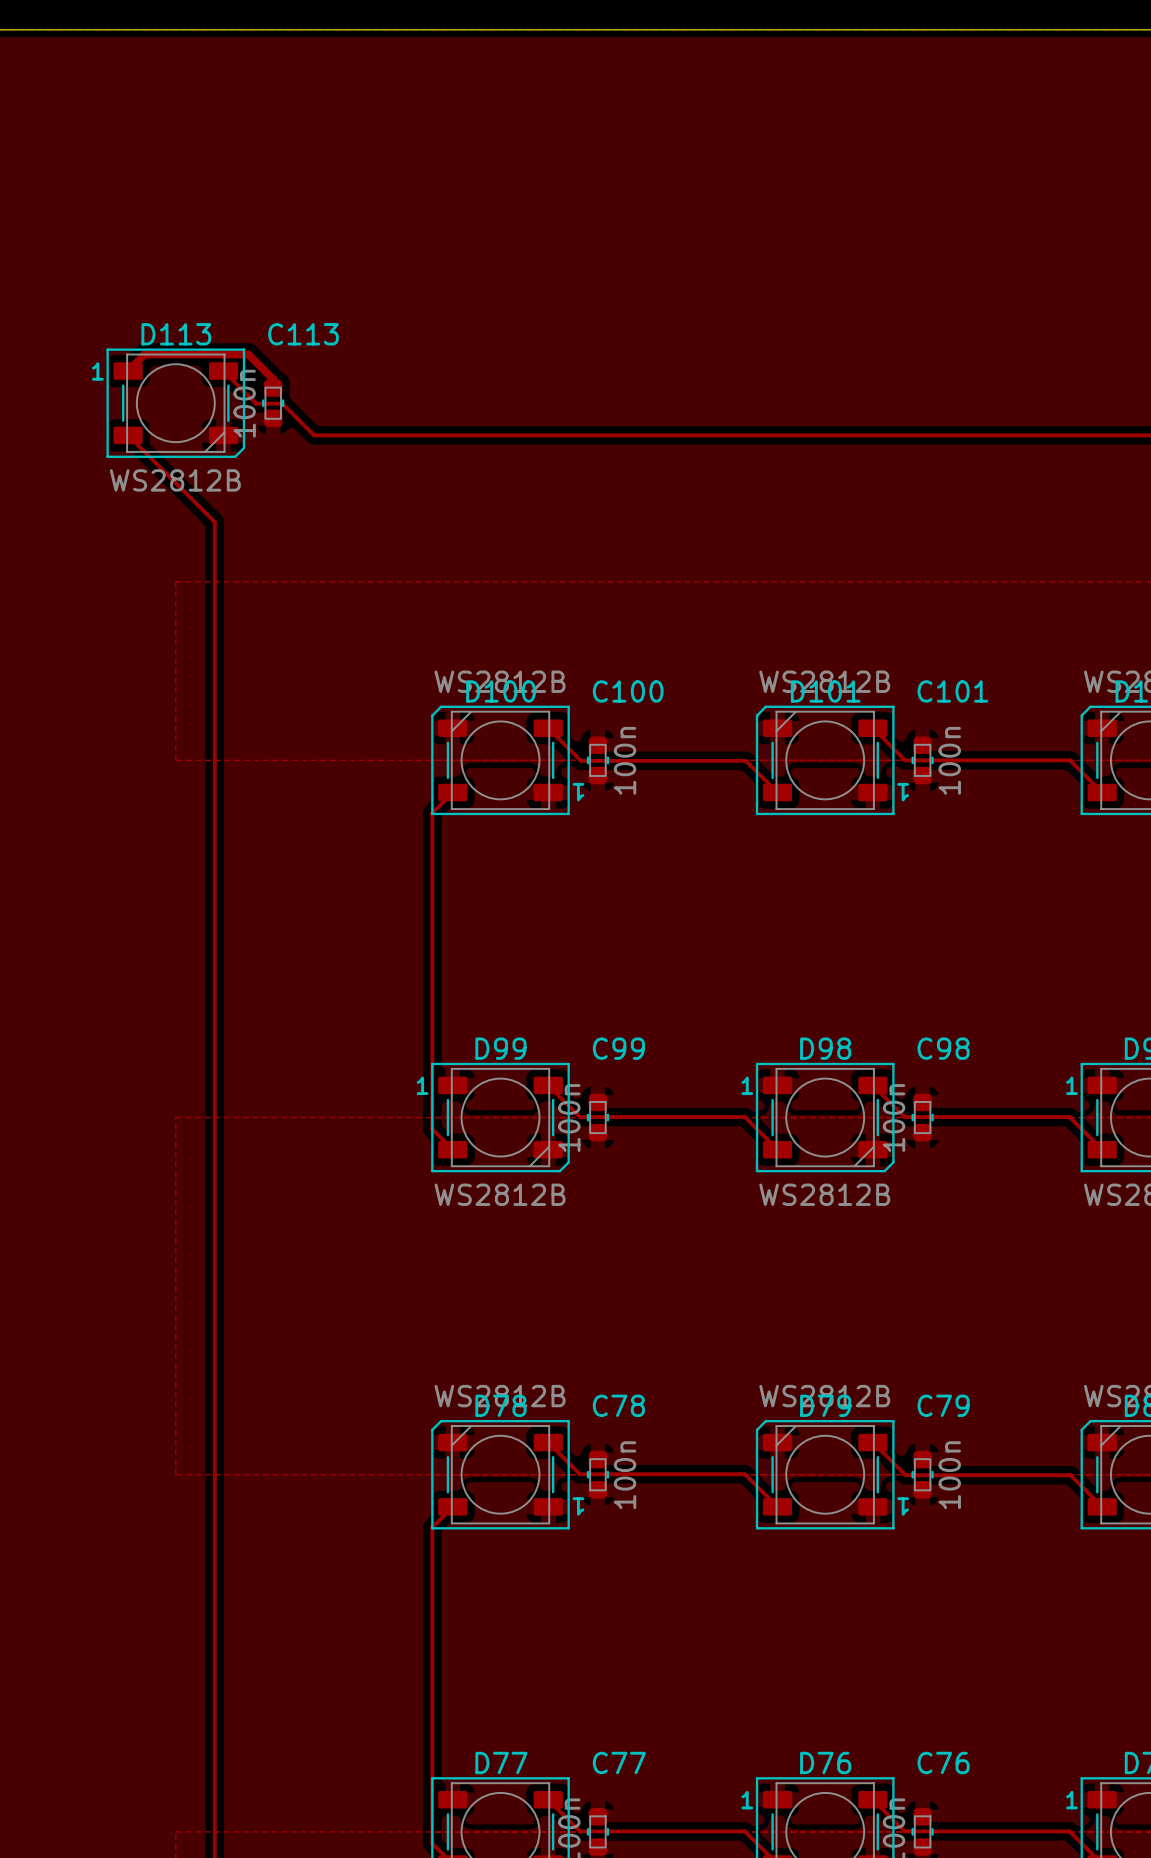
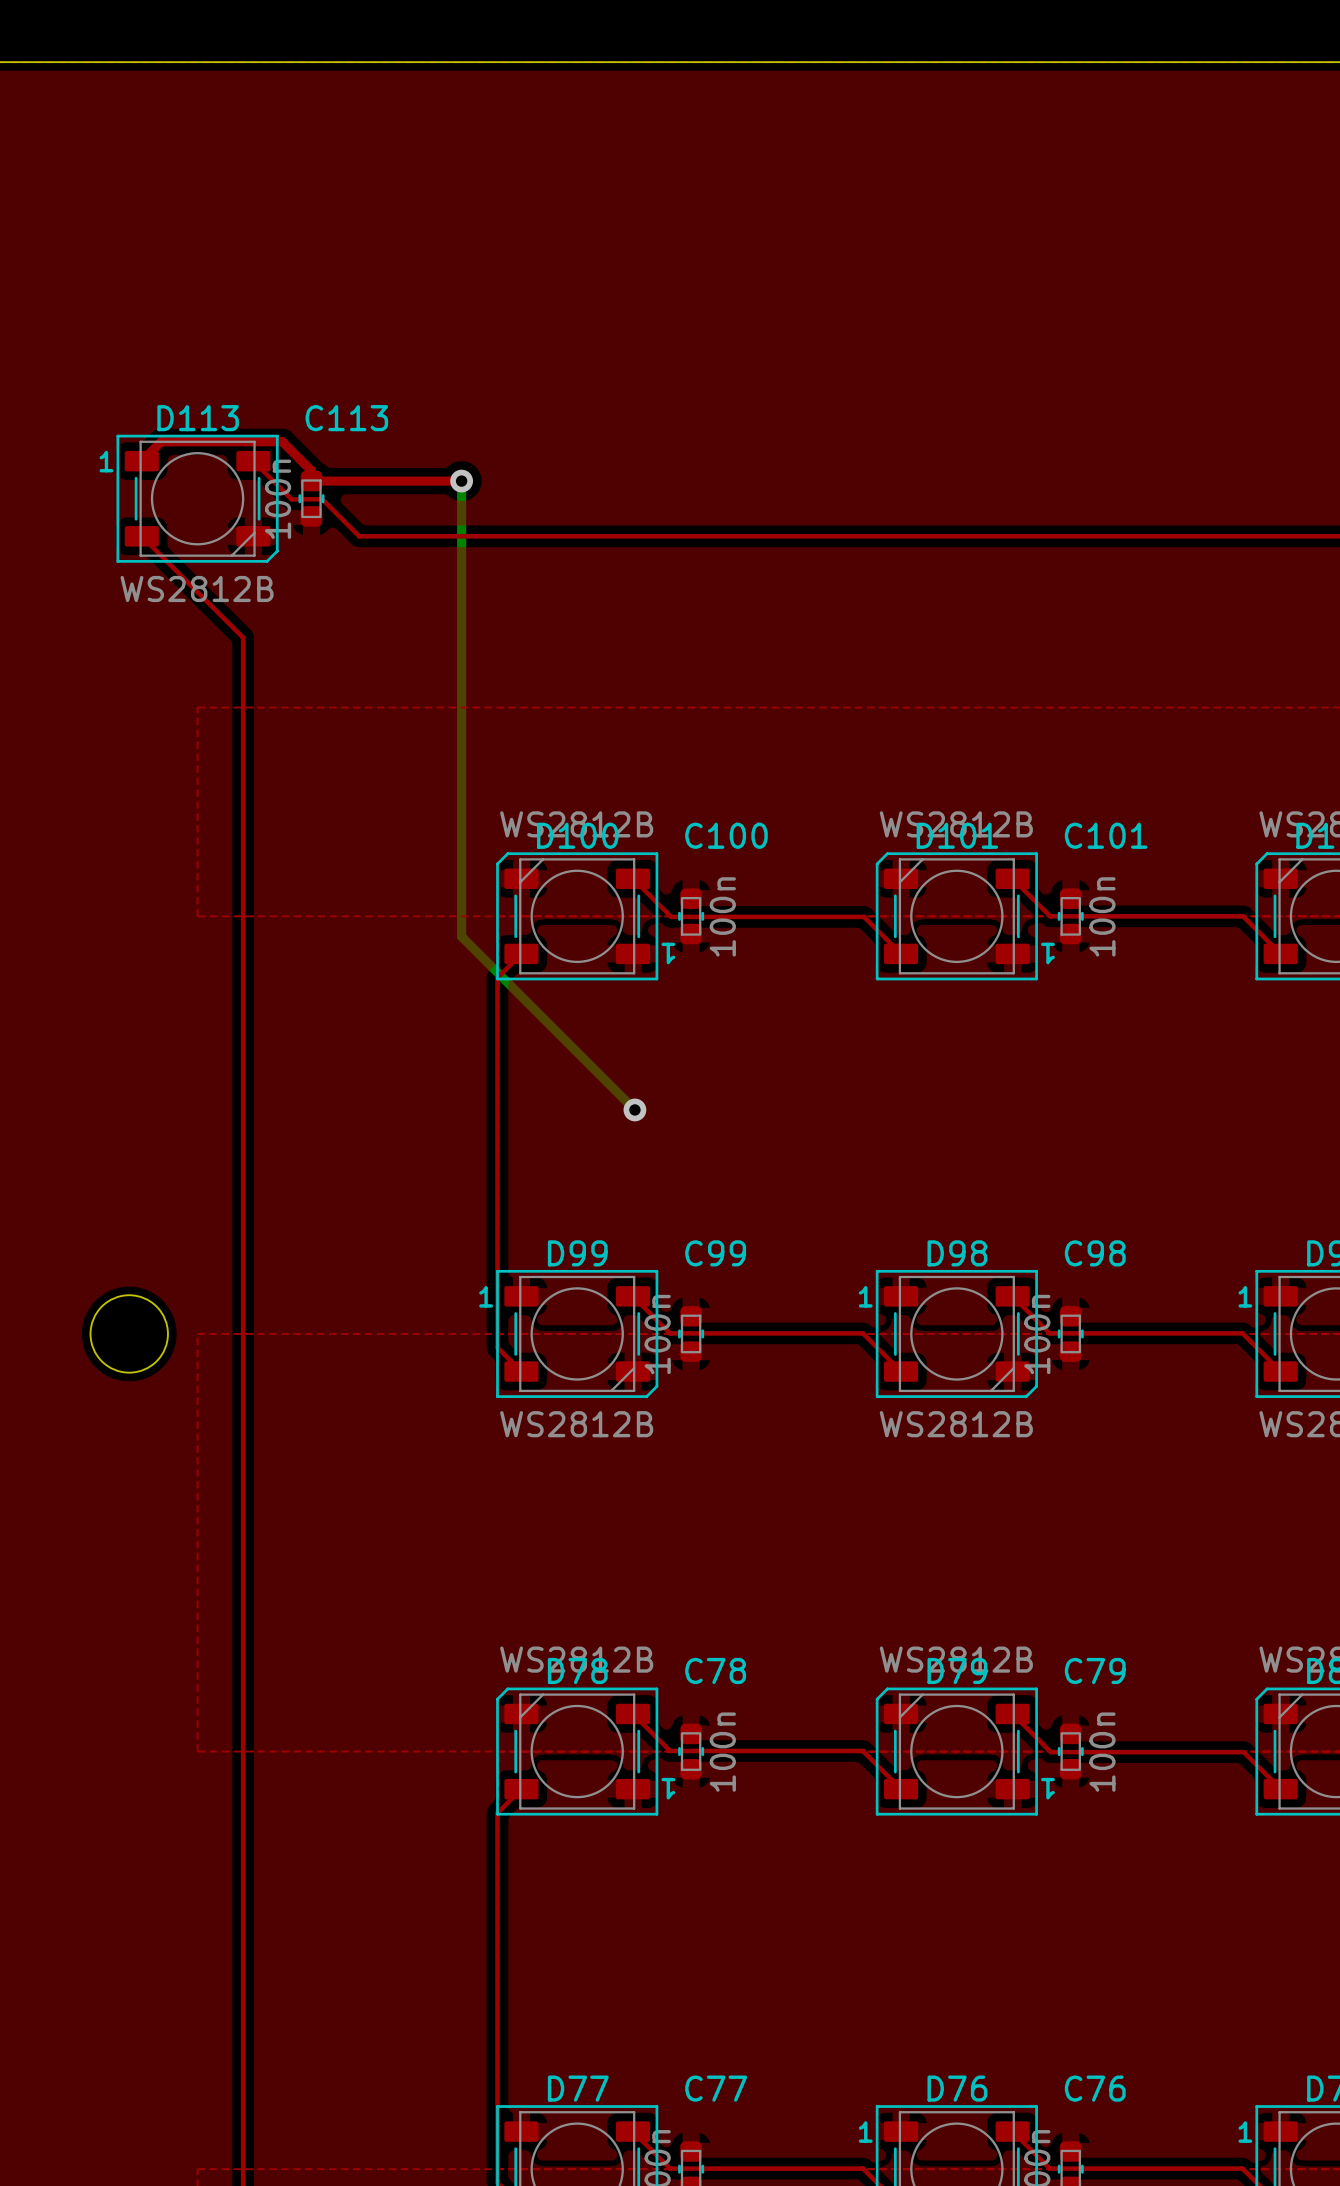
top track: none -> (311, 481) (461, 481)
bottom track: none -> (461, 481) (461, 936) (634, 1109)
via: none -> (461, 481)
via: none -> (634, 1109)
round board edge: none -> [89, 1294, 169, 1374]

